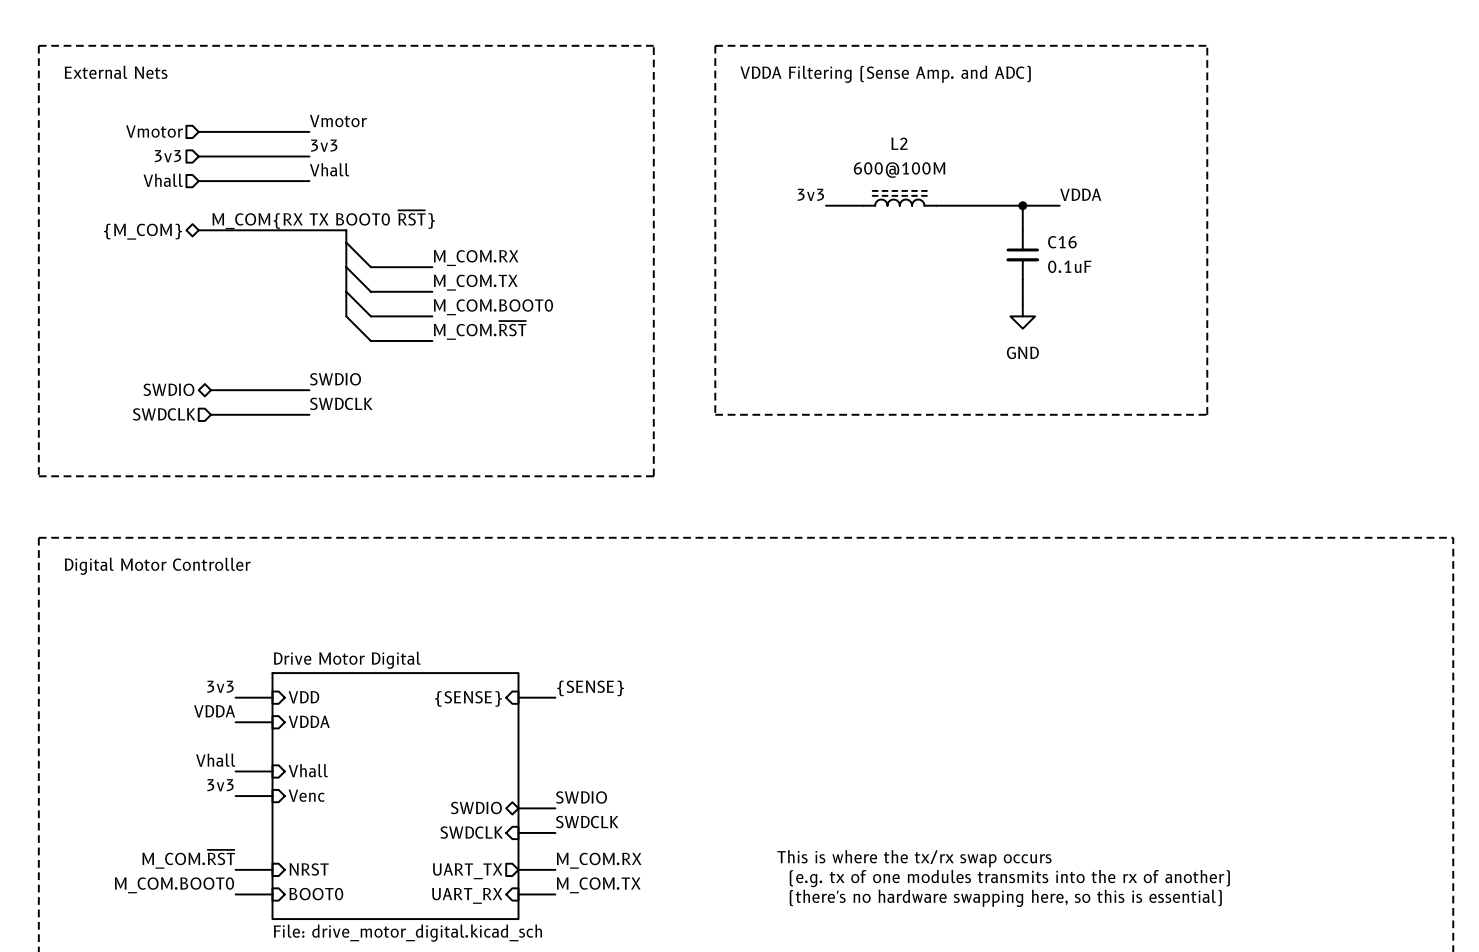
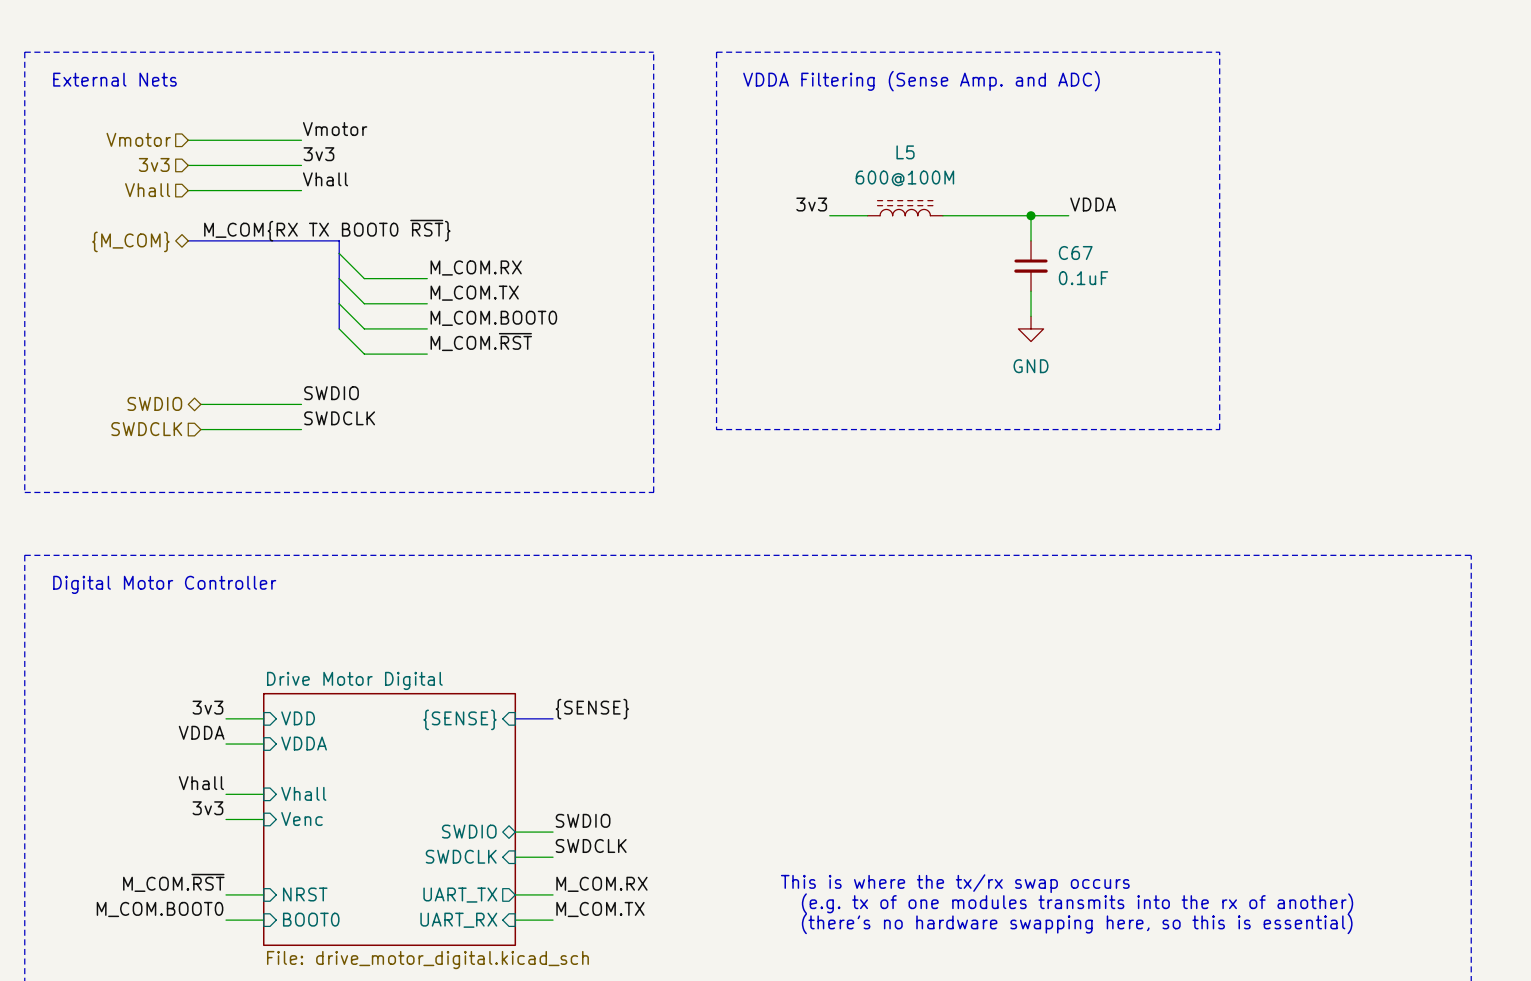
L2 name: L2 (899, 143) -> L5 (905, 152)
C16 name: C16 (1062, 242) -> C67 (1075, 253)

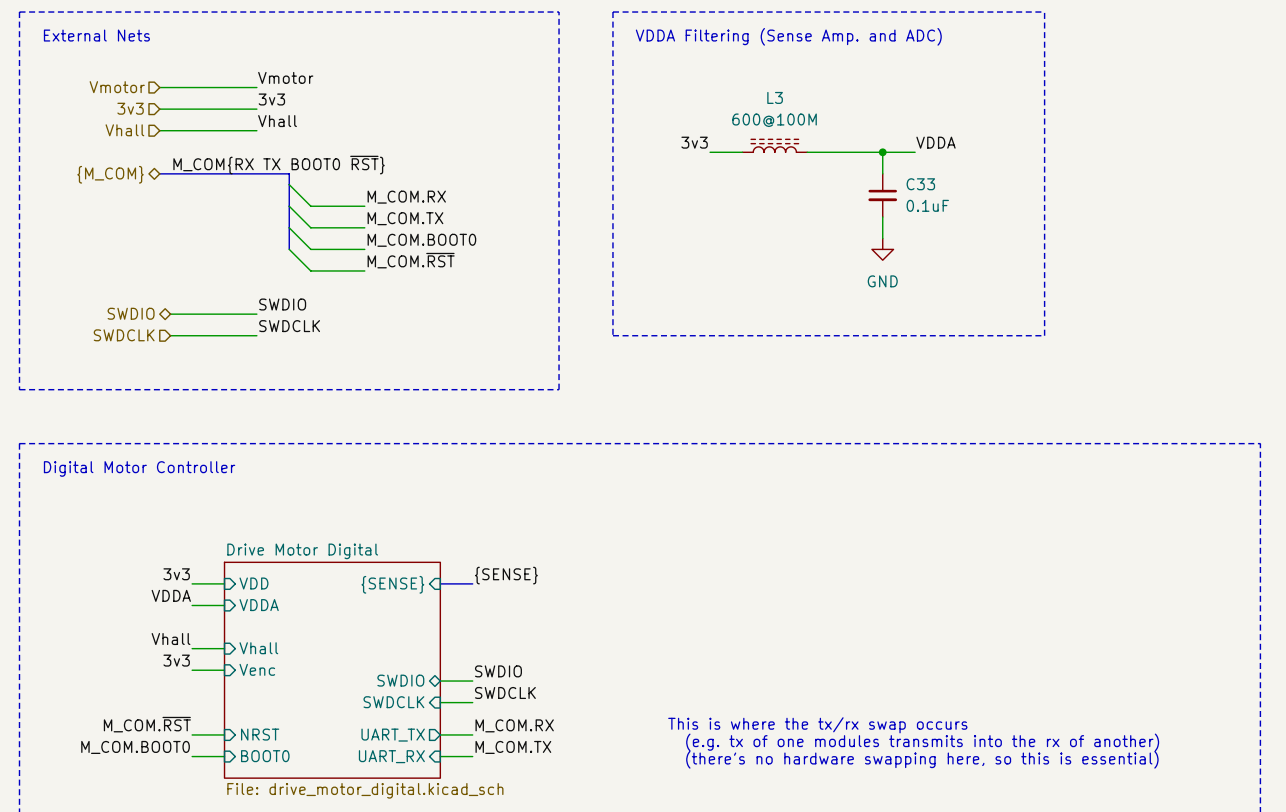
L5 name: L5 (905, 152) -> L3 (775, 97)
C67 name: C67 (1075, 253) -> C33 (920, 184)

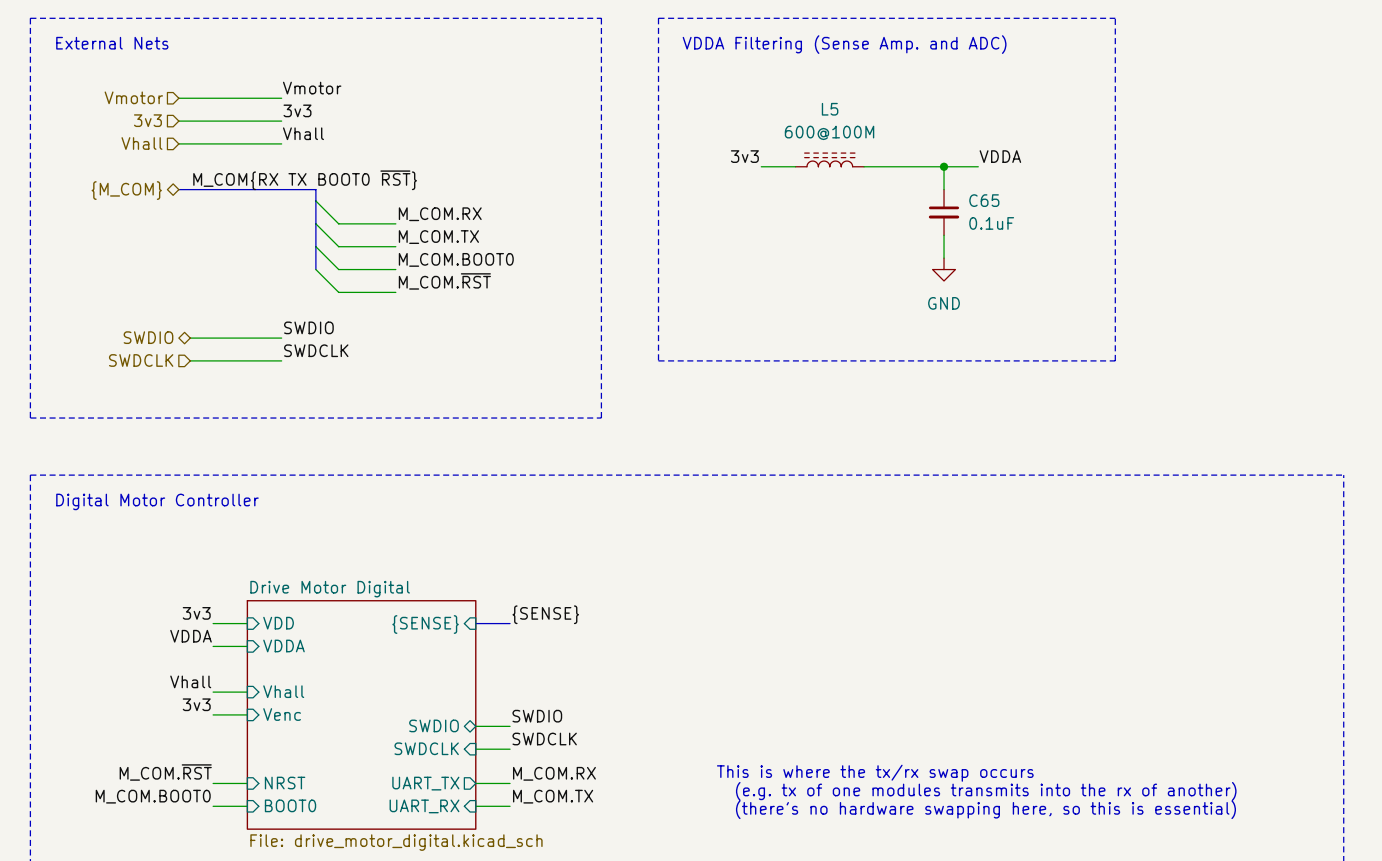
L3 name: L3 (775, 97) -> L5 (830, 109)
C33 name: C33 (920, 184) -> C65 (984, 200)

